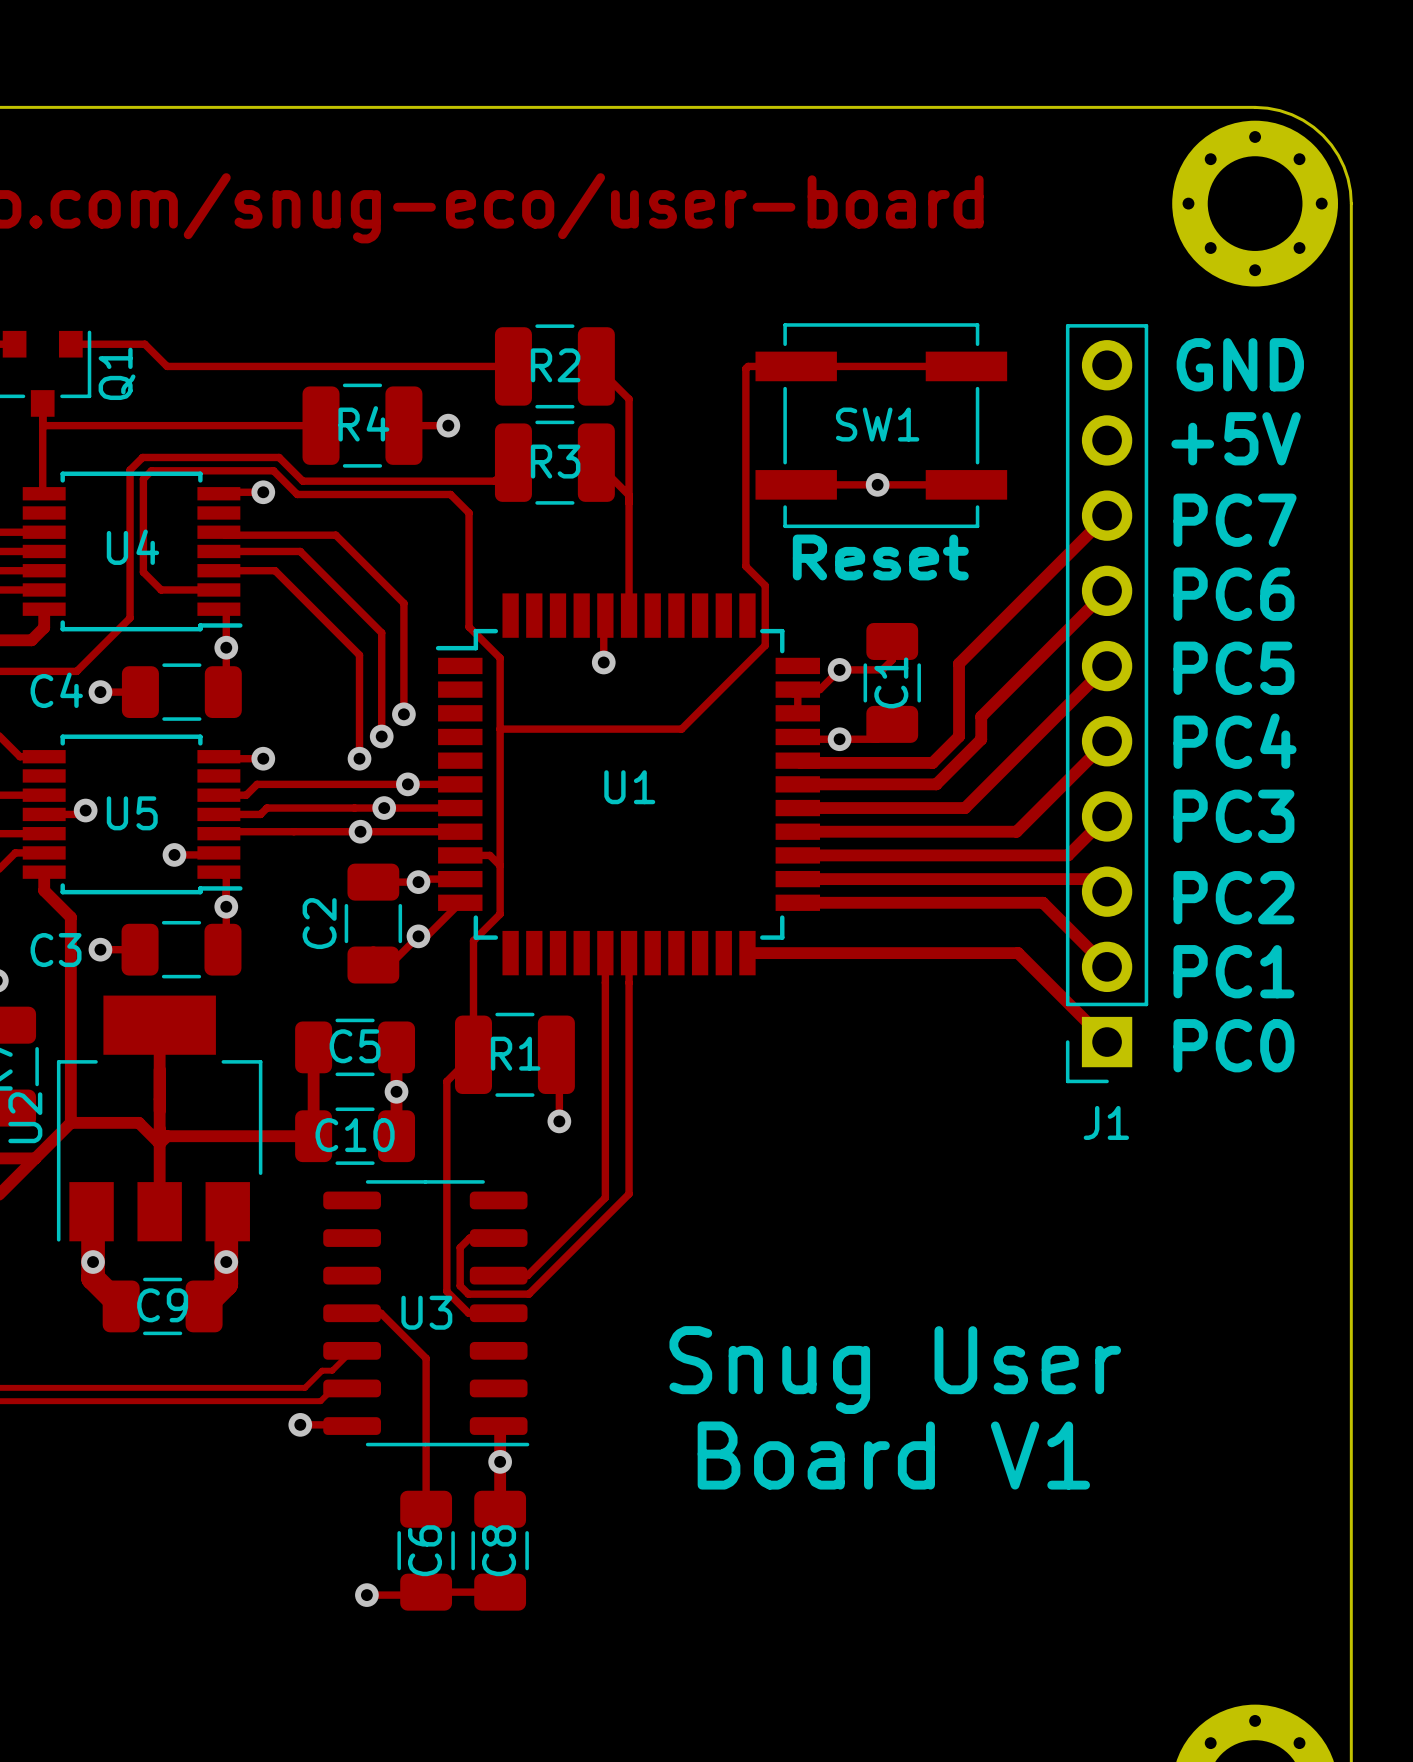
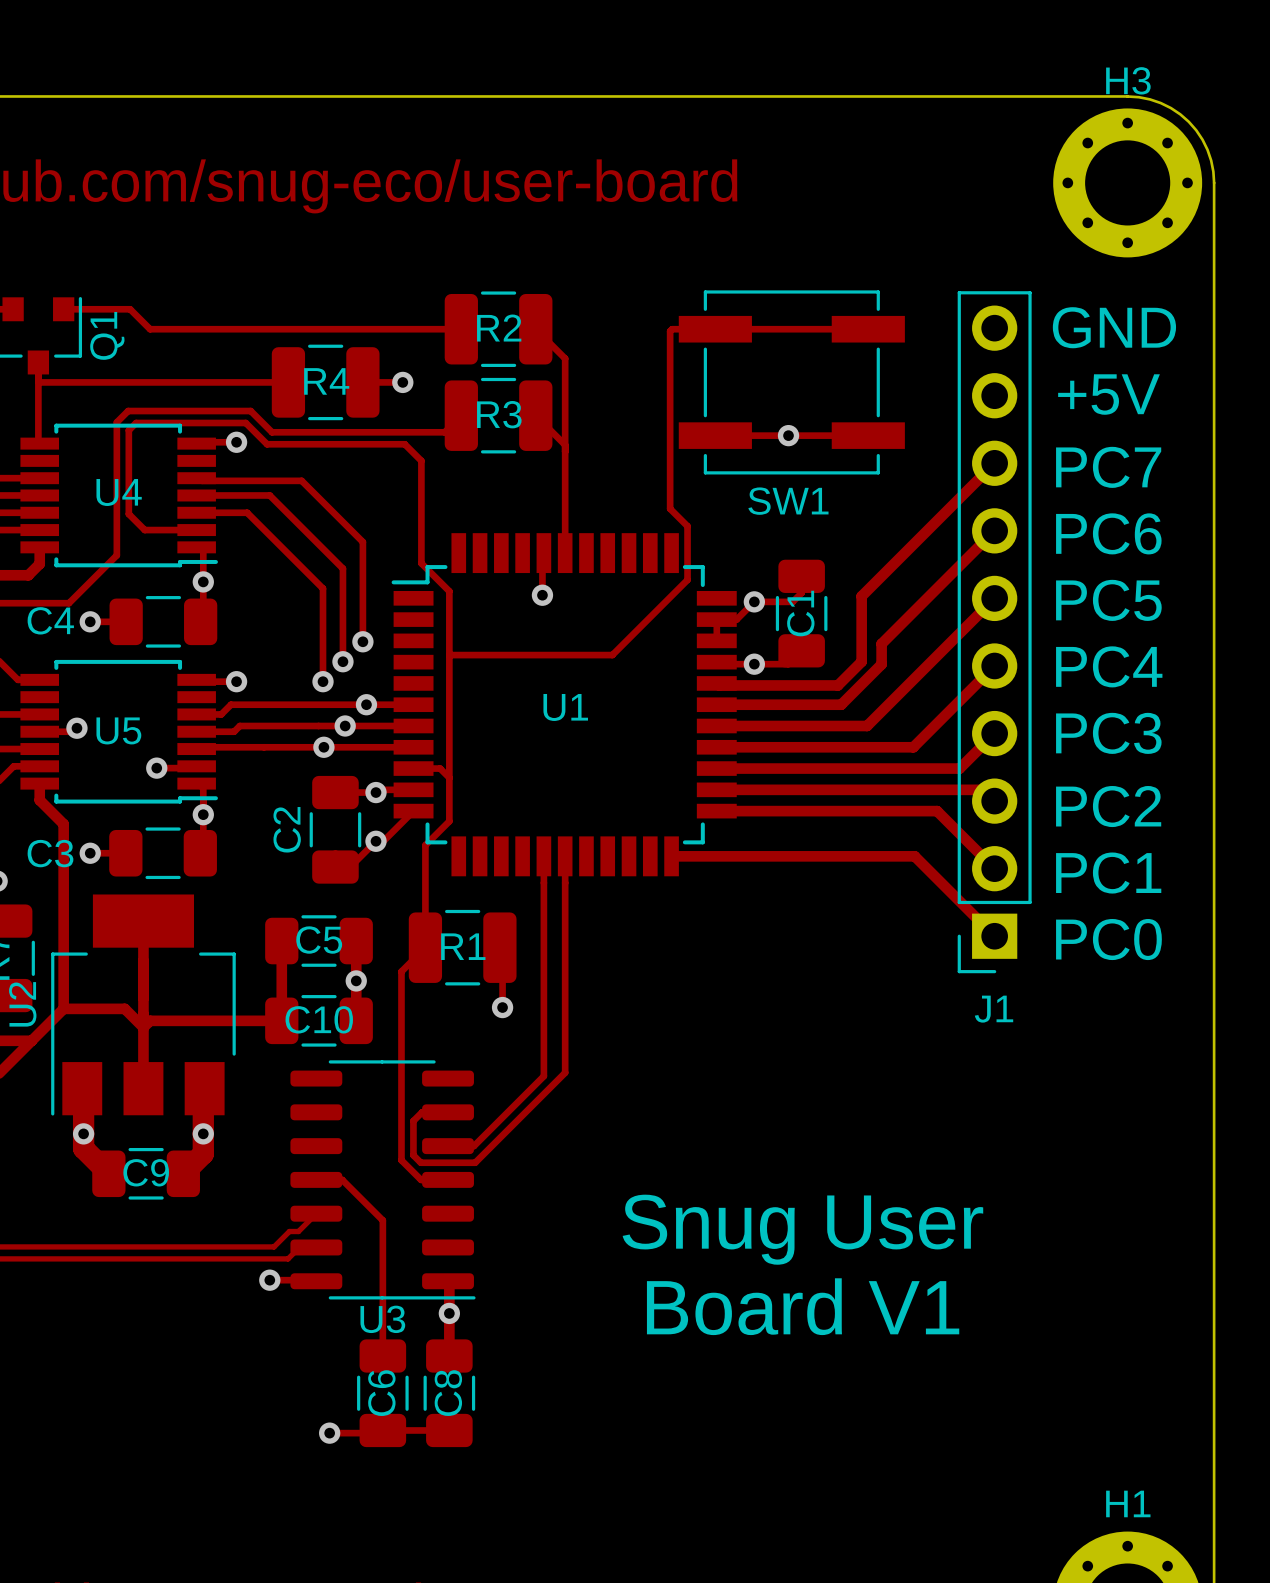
H3 name: none -> H3 (1128, 80)
SW1 name position: SW1 (877, 424) -> SW1 (788, 501)
text: Reset (880, 557) -> none
U3 name position: U3 (426, 1312) -> U3 (382, 1319)
H1 name: none -> H1 (1128, 1503)

